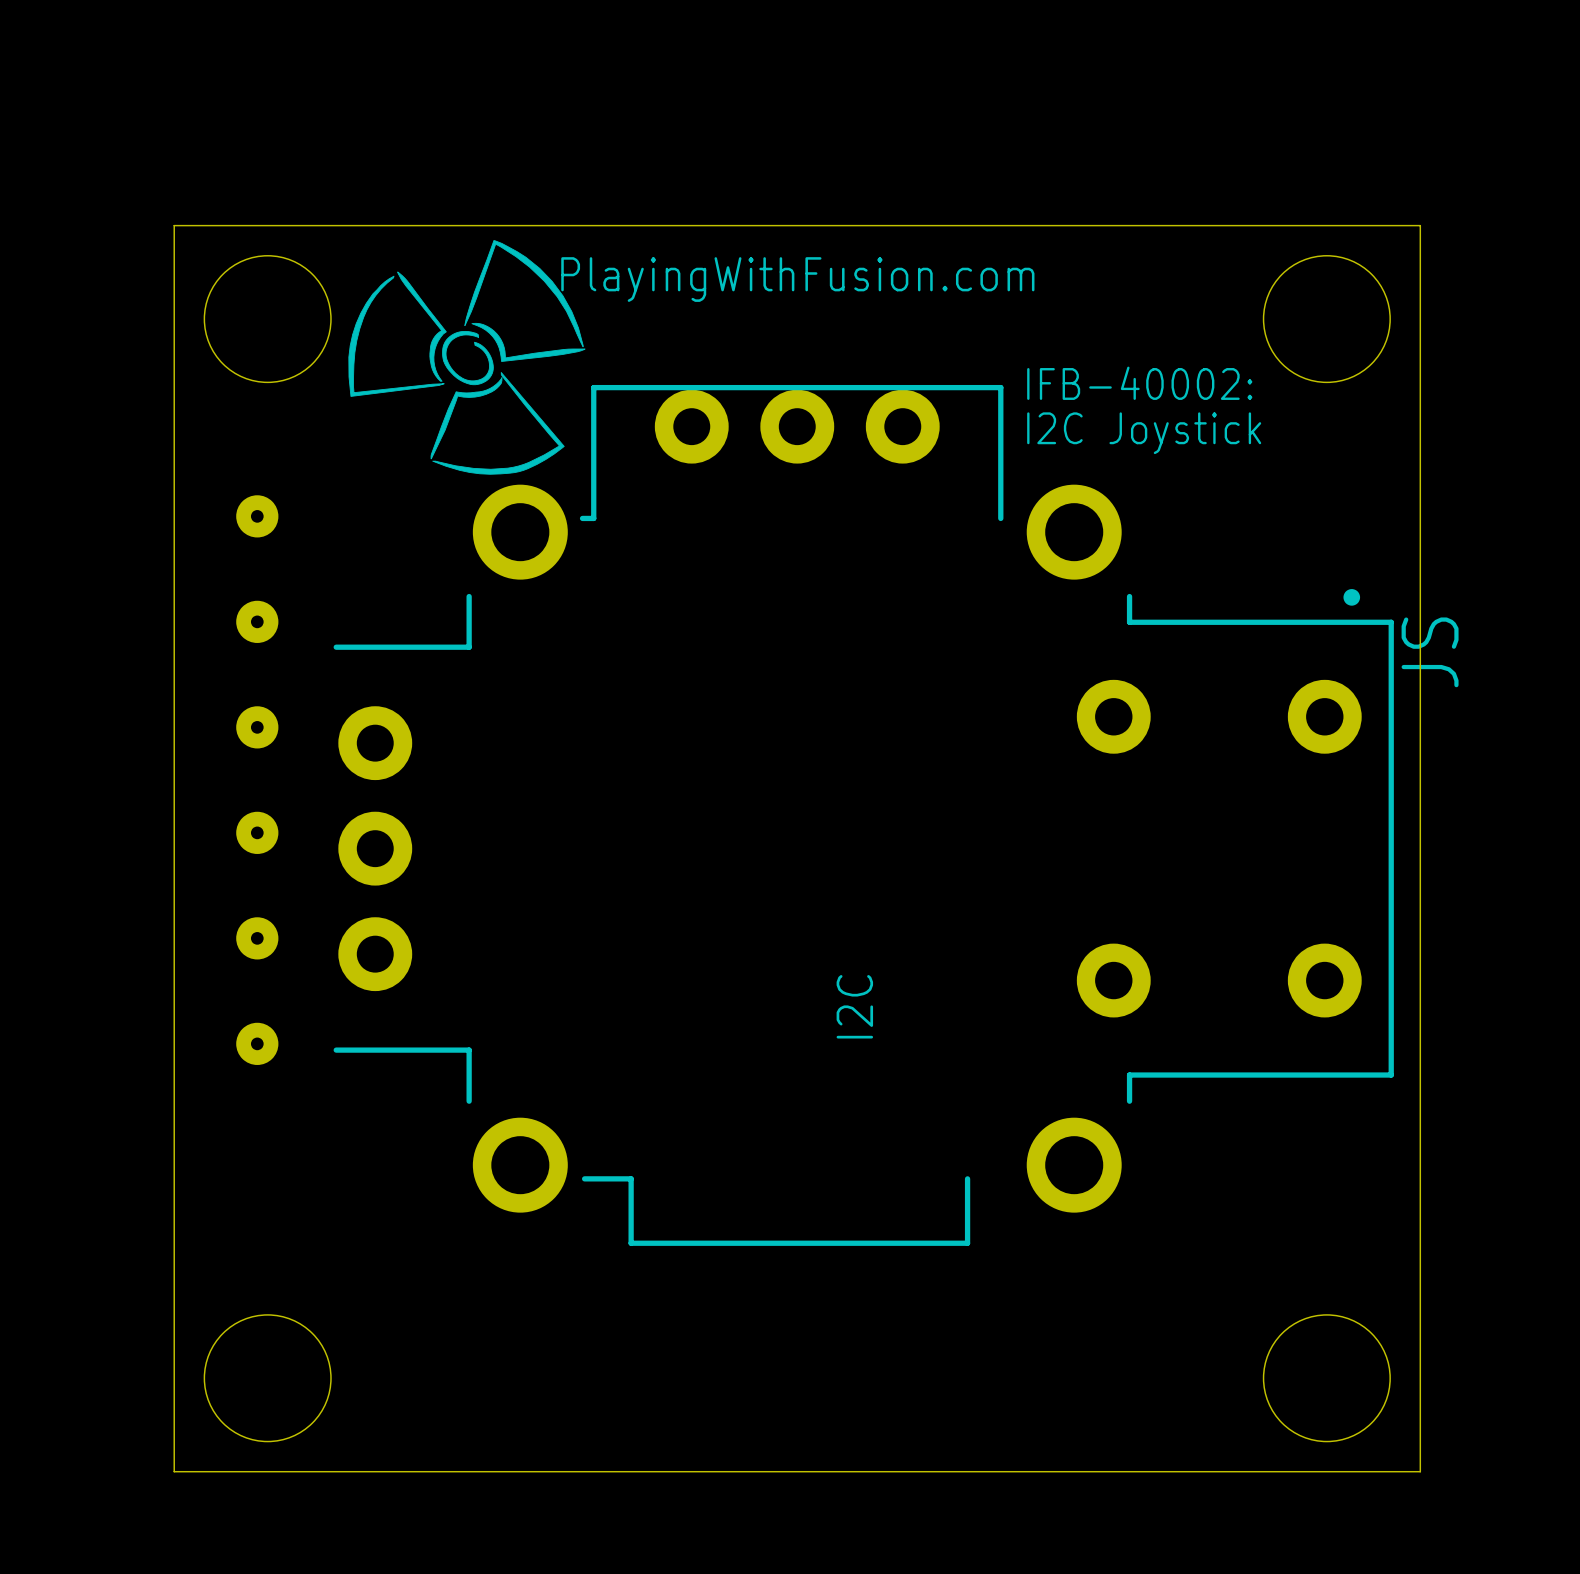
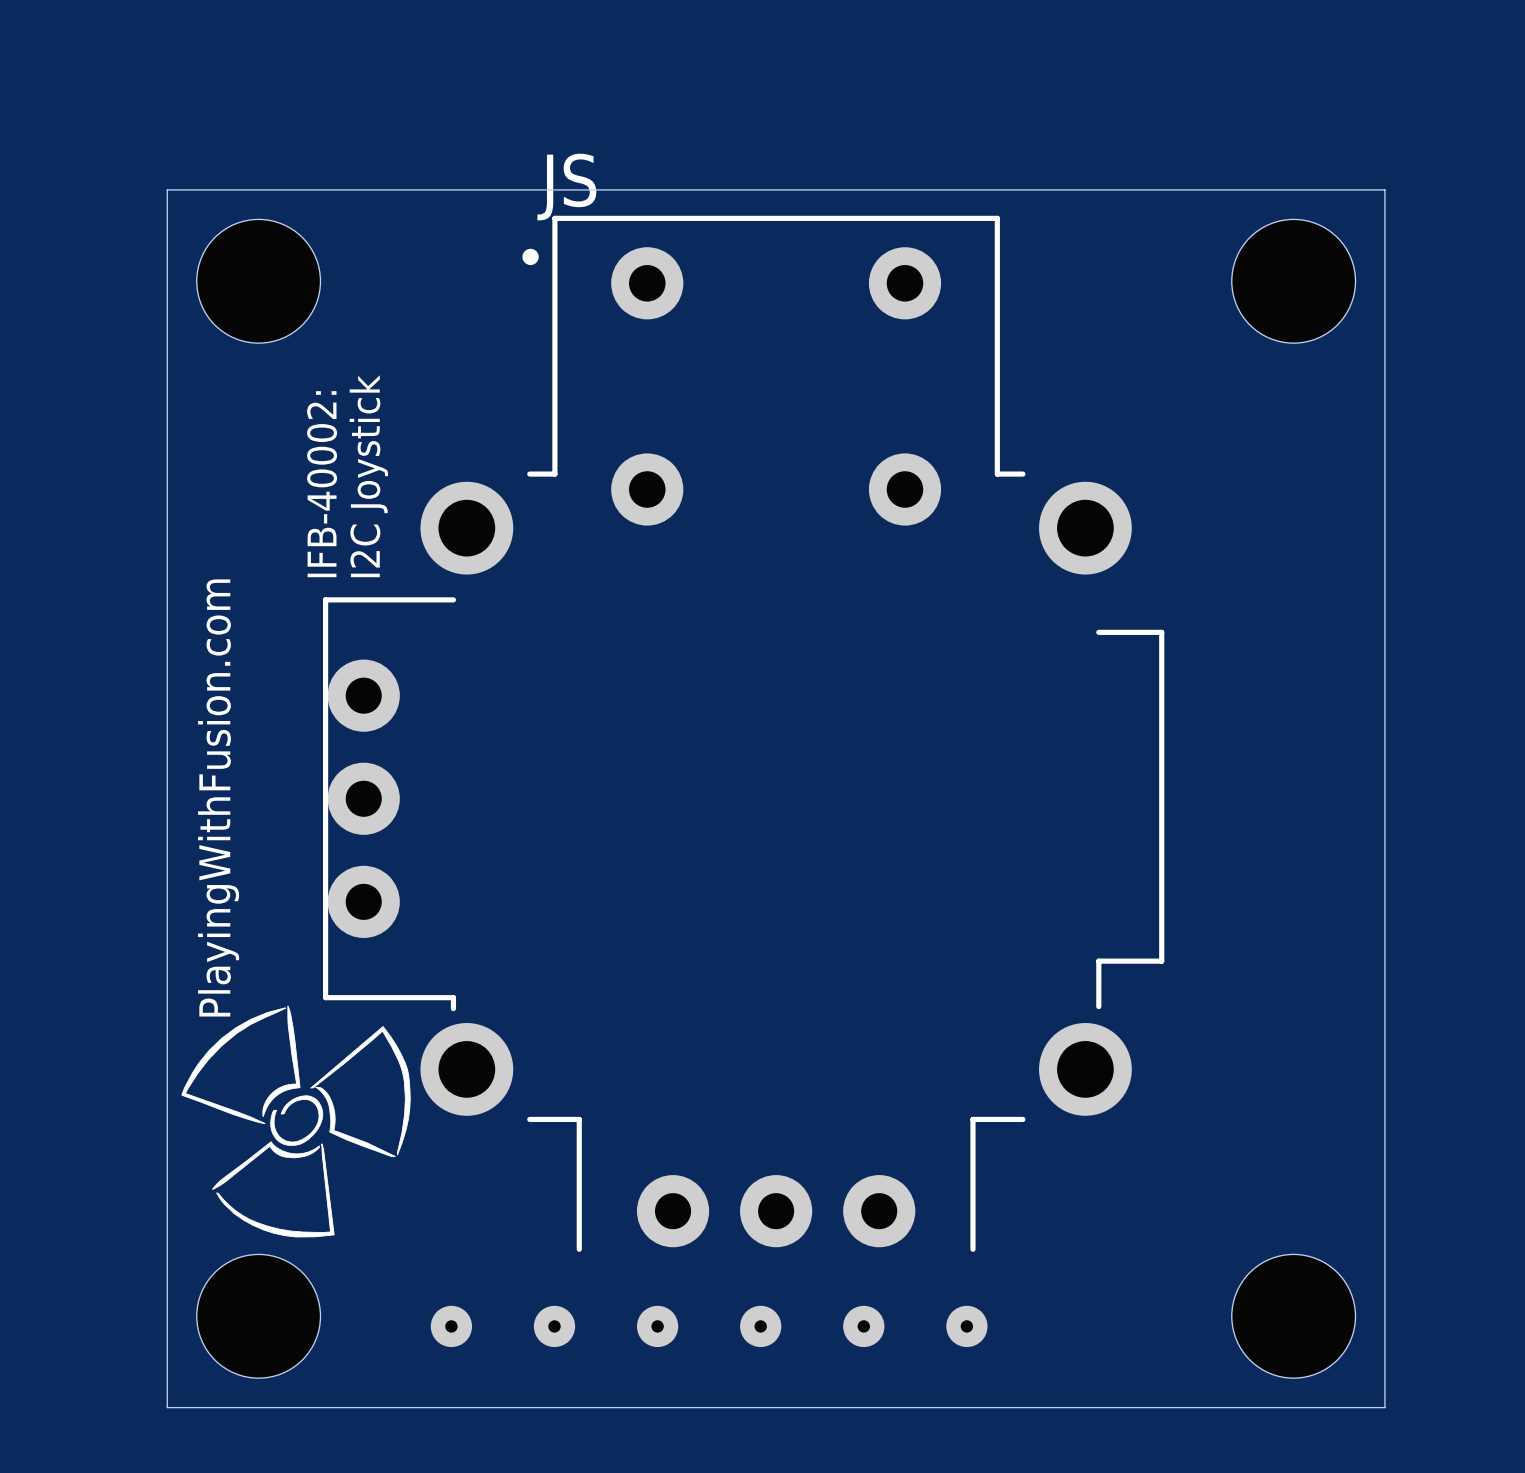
drawing: [348, 240, 586, 475] -> none
text rotation: 0° (797, 279) -> 90° counterclockwise (218, 797)
text position: PlayingWithFusion.com (797, 279) -> PlayingWithFusion.com (218, 797)
text rotation: 0° (1139, 383) -> 90° counterclockwise (322, 484)
text position: IFB-40002: (1139, 383) -> IFB-40002: (322, 484)
text rotation: 0° (1144, 433) -> 90° counterclockwise (368, 476)
text position: I2C Joystick (1144, 433) -> I2C Joystick (368, 476)
part: (257, 516) -> none
part: (257, 621) -> none
part: (257, 727) -> none
JS rotation: 0° (863, 815) -> 90° counterclockwise (743, 733)
part: (257, 832) -> none
part: (257, 938) -> none
text: I2C (854, 1006) -> none
part: (257, 1043) -> none
drawing: none -> [181, 1005, 411, 1238]
part: none -> (451, 1326)
part: none -> (554, 1326)
part: none -> (657, 1326)
part: none -> (760, 1326)
part: none -> (863, 1326)
part: none -> (966, 1326)

